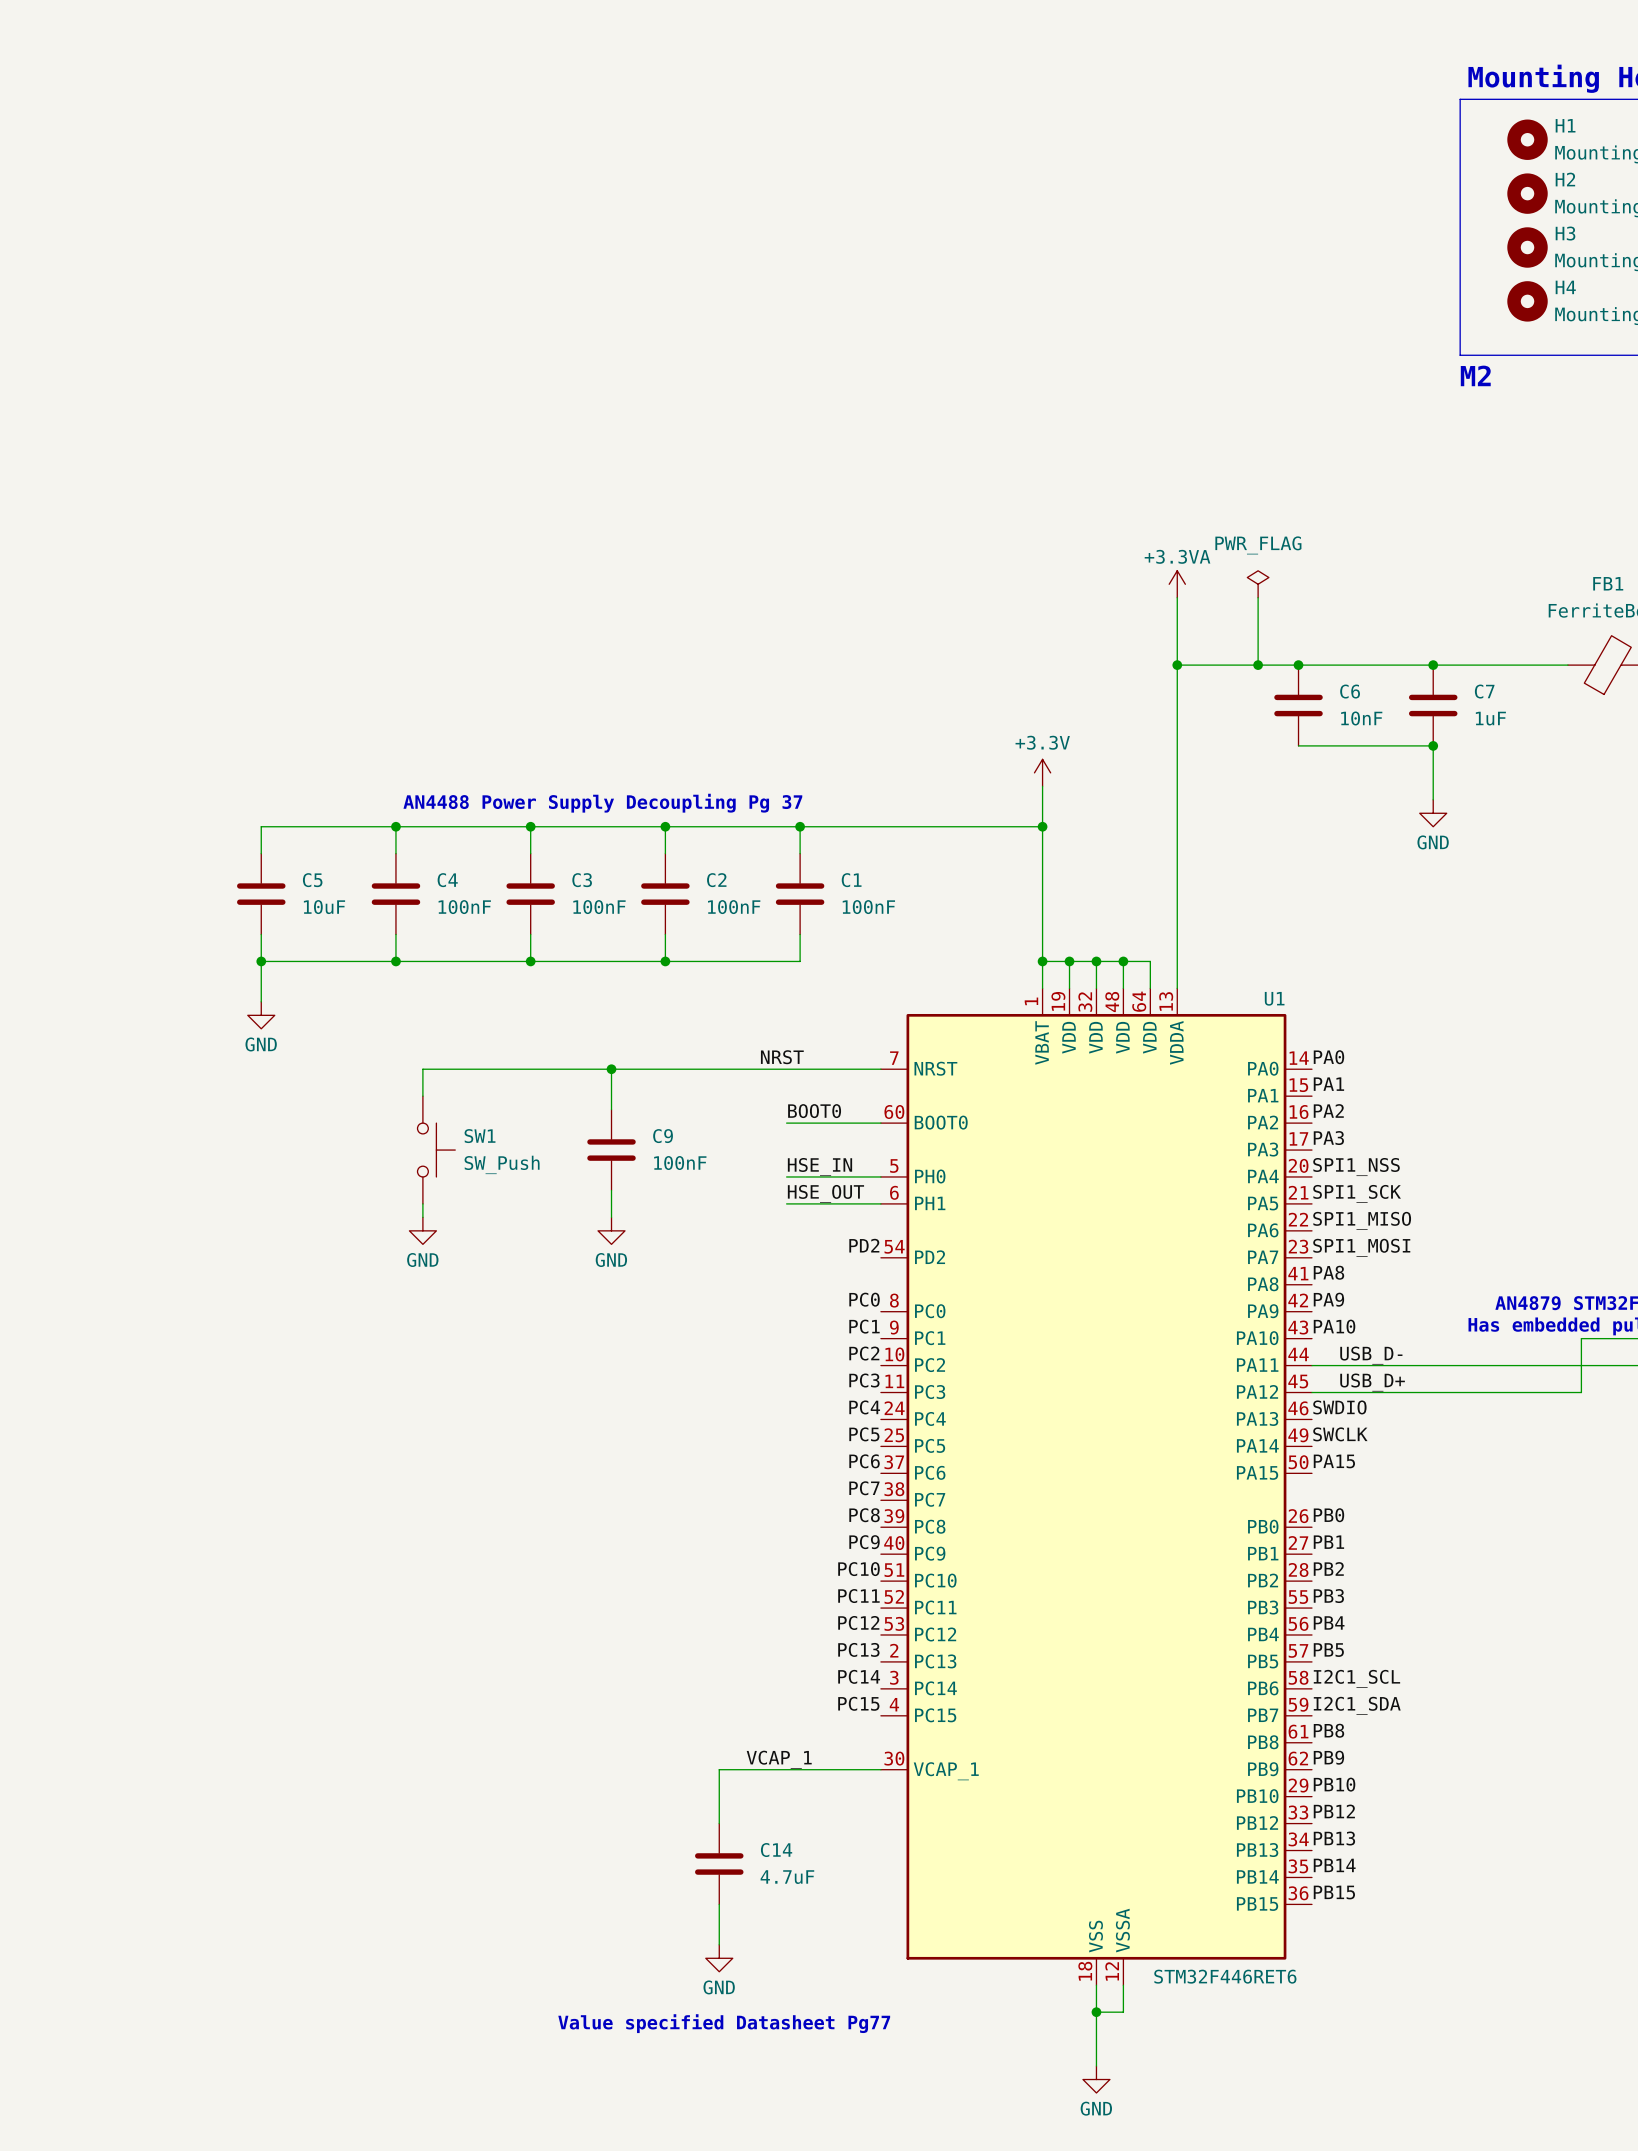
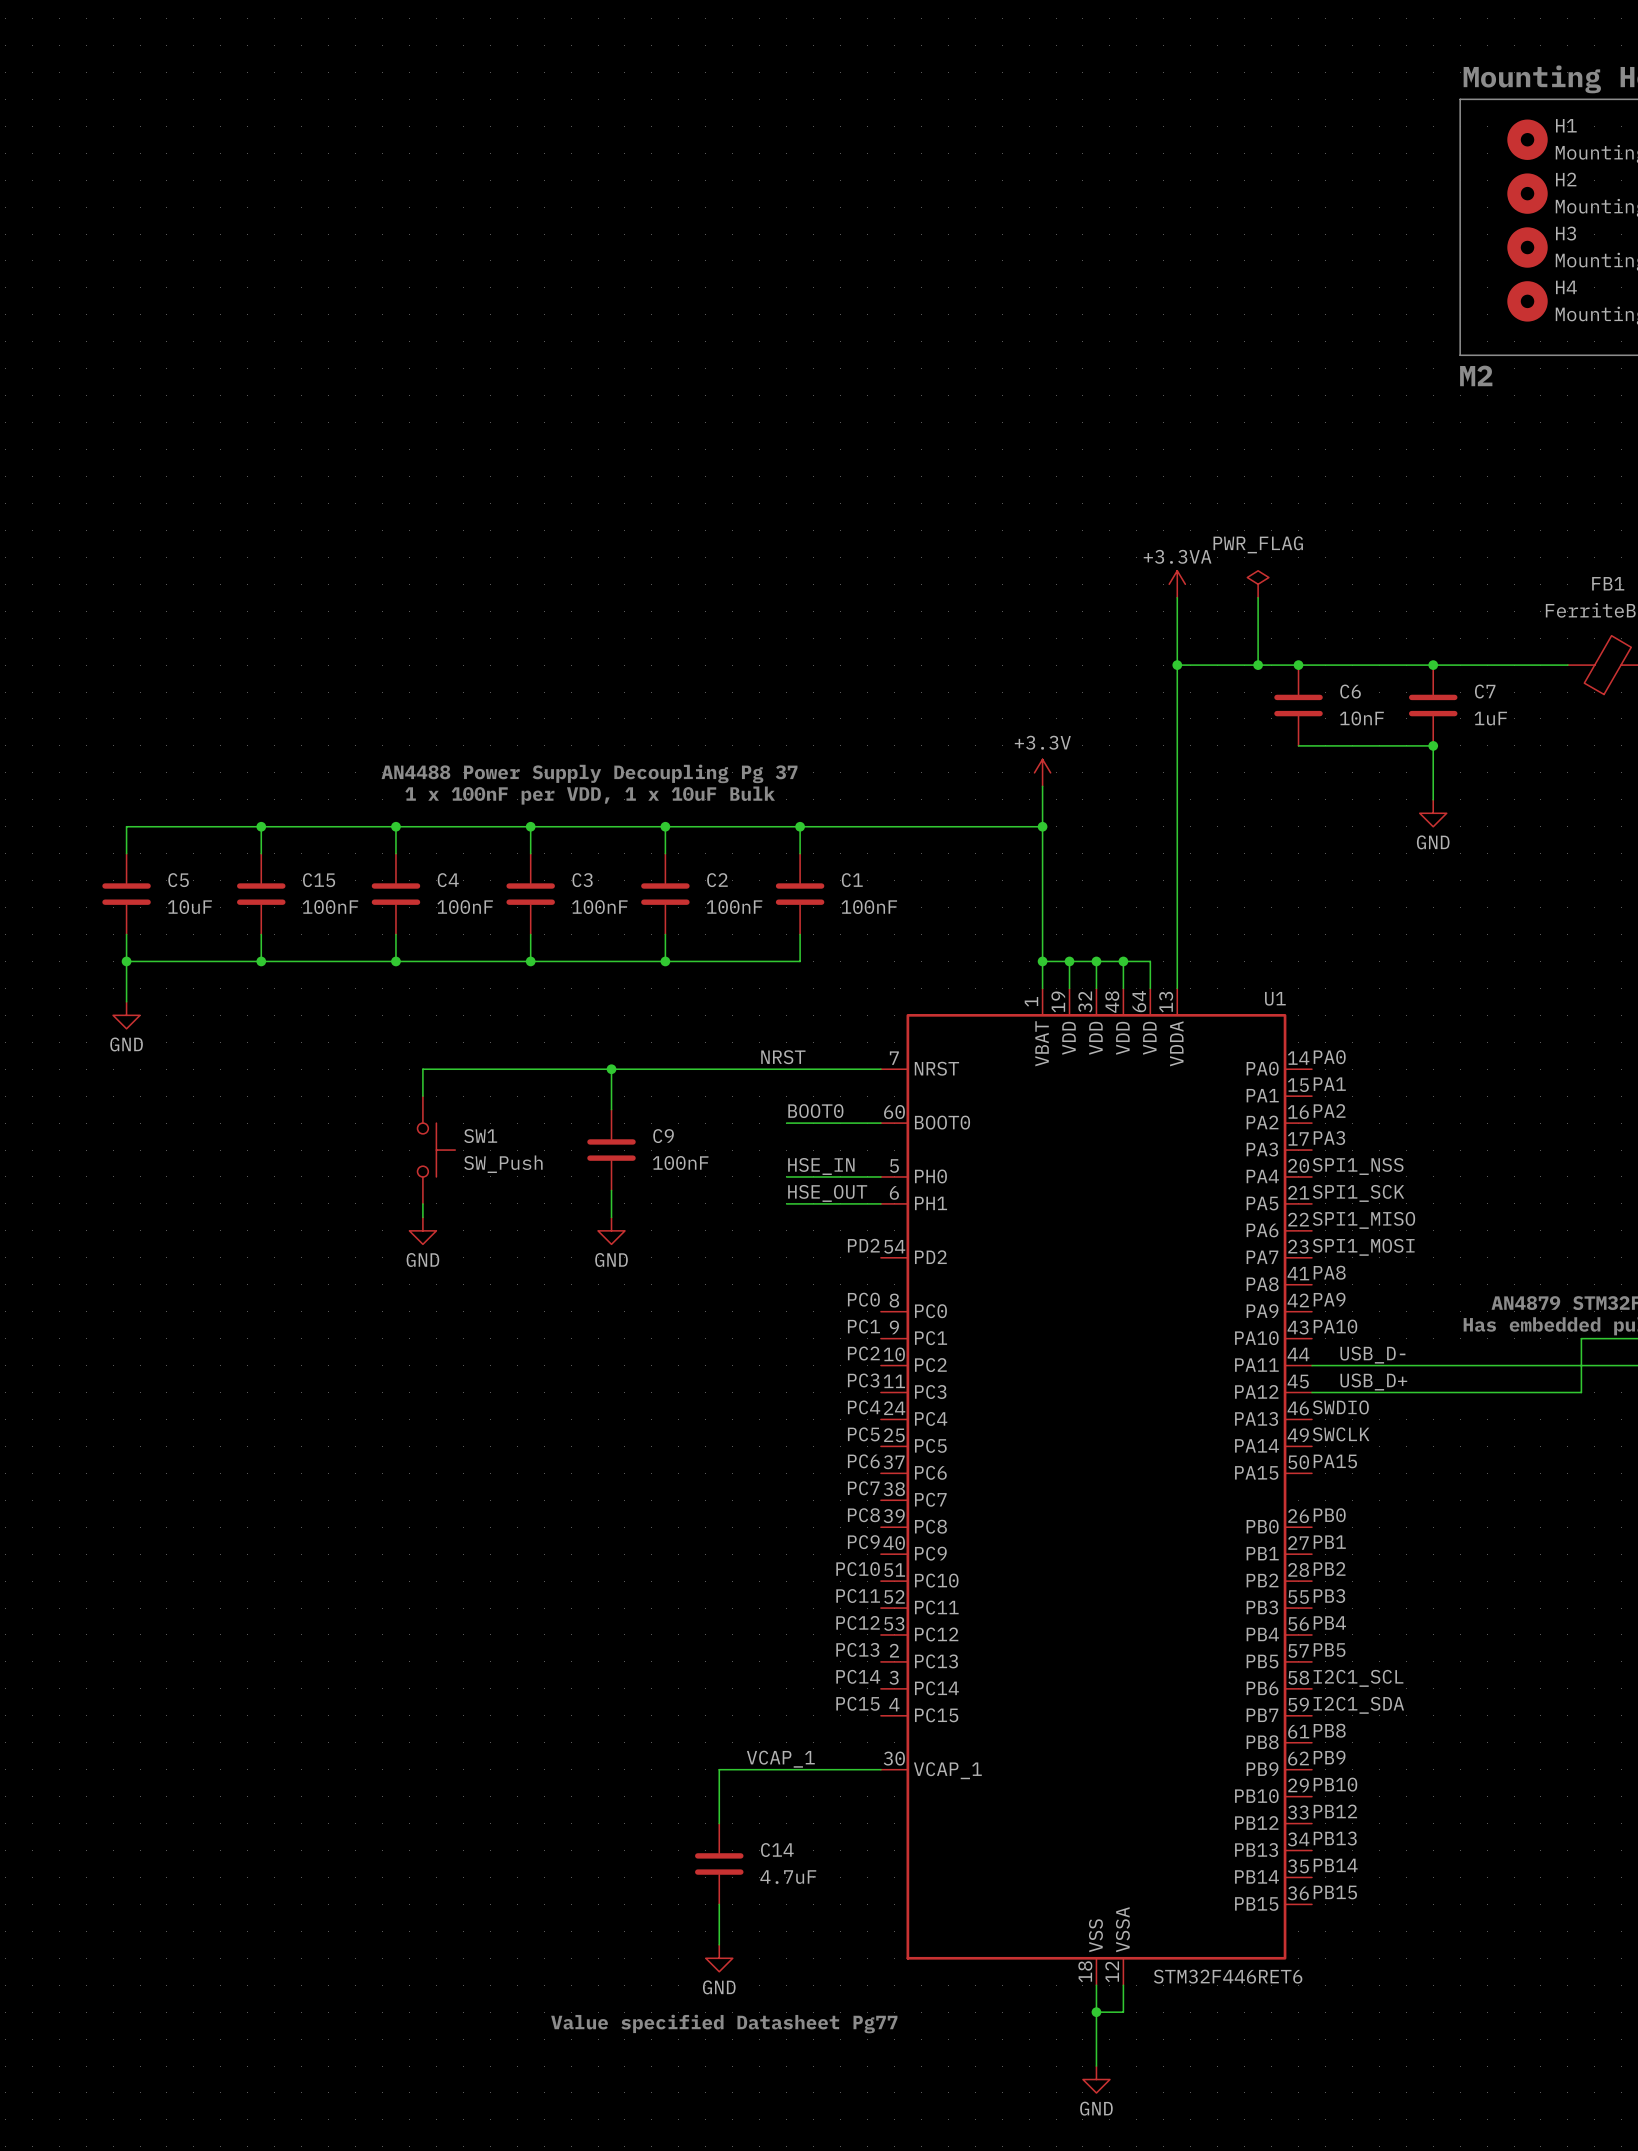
text: none -> 1 x 100nF per VDD, 1 x 10uF Bulk (590, 795)
text position: AN4488 Power Supply Decoupling Pg 37 (602, 803) -> AN4488 Power Supply Decoupling Pg 37 (589, 773)
wire: none -> (261, 826) (126, 826) (126, 853)
junction: none -> (261, 826)
C5 name: C5 (312, 880) -> C15 (319, 880)
C5: none -> 10uF (126, 894)
C5 value: 10uF (324, 907) -> 100nF (330, 907)
wire: none -> (126, 934) (126, 1001)
junction: none -> (126, 961)
wire: (261, 961) (261, 1001) -> (261, 961) (126, 961)
power symbol position: GND (261, 1015) -> GND (126, 1015)

